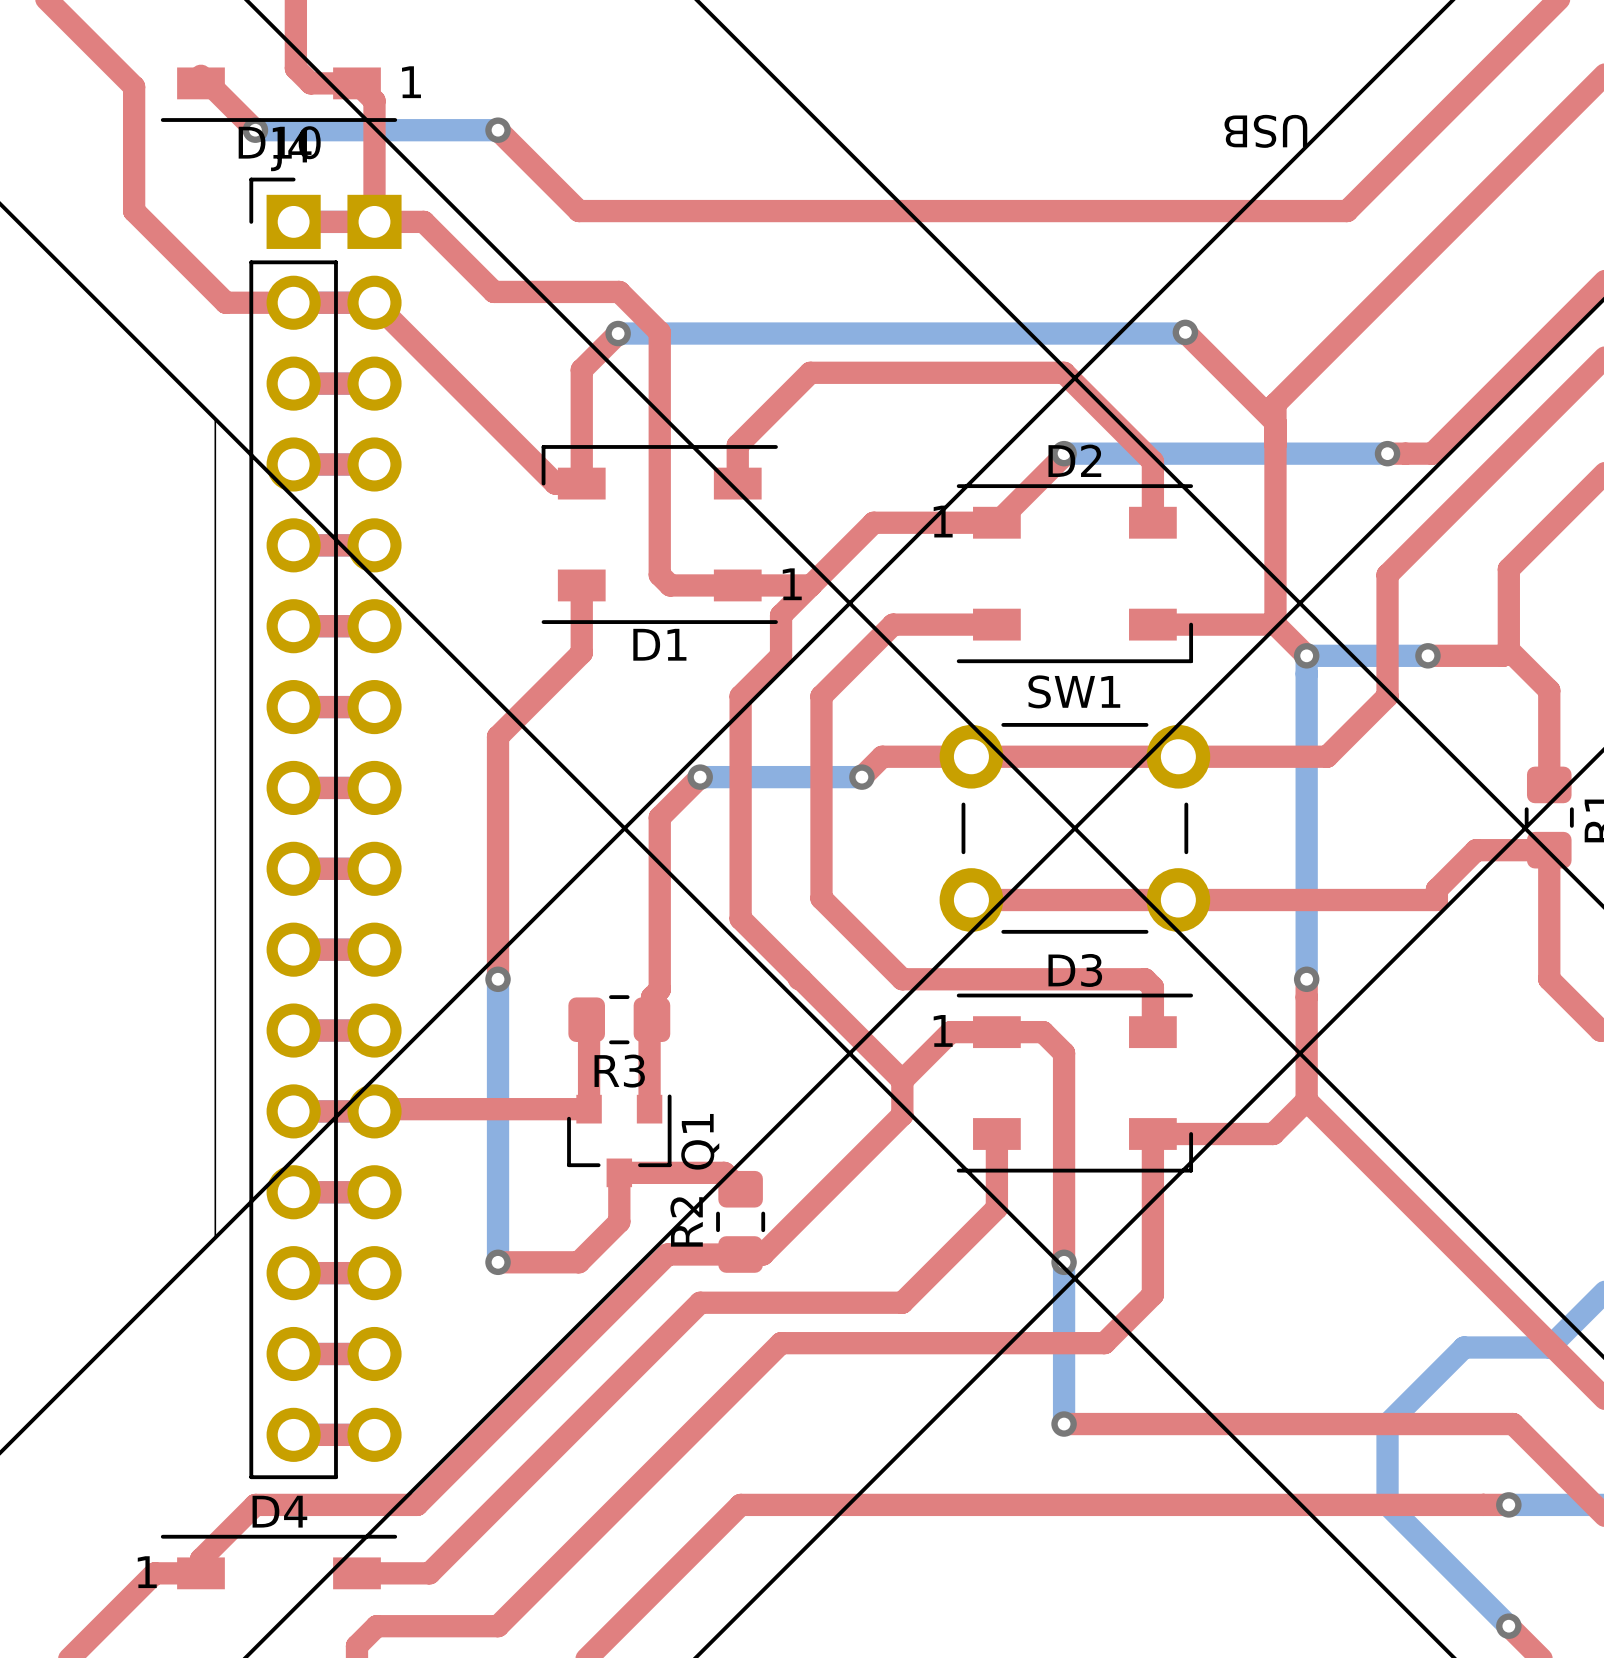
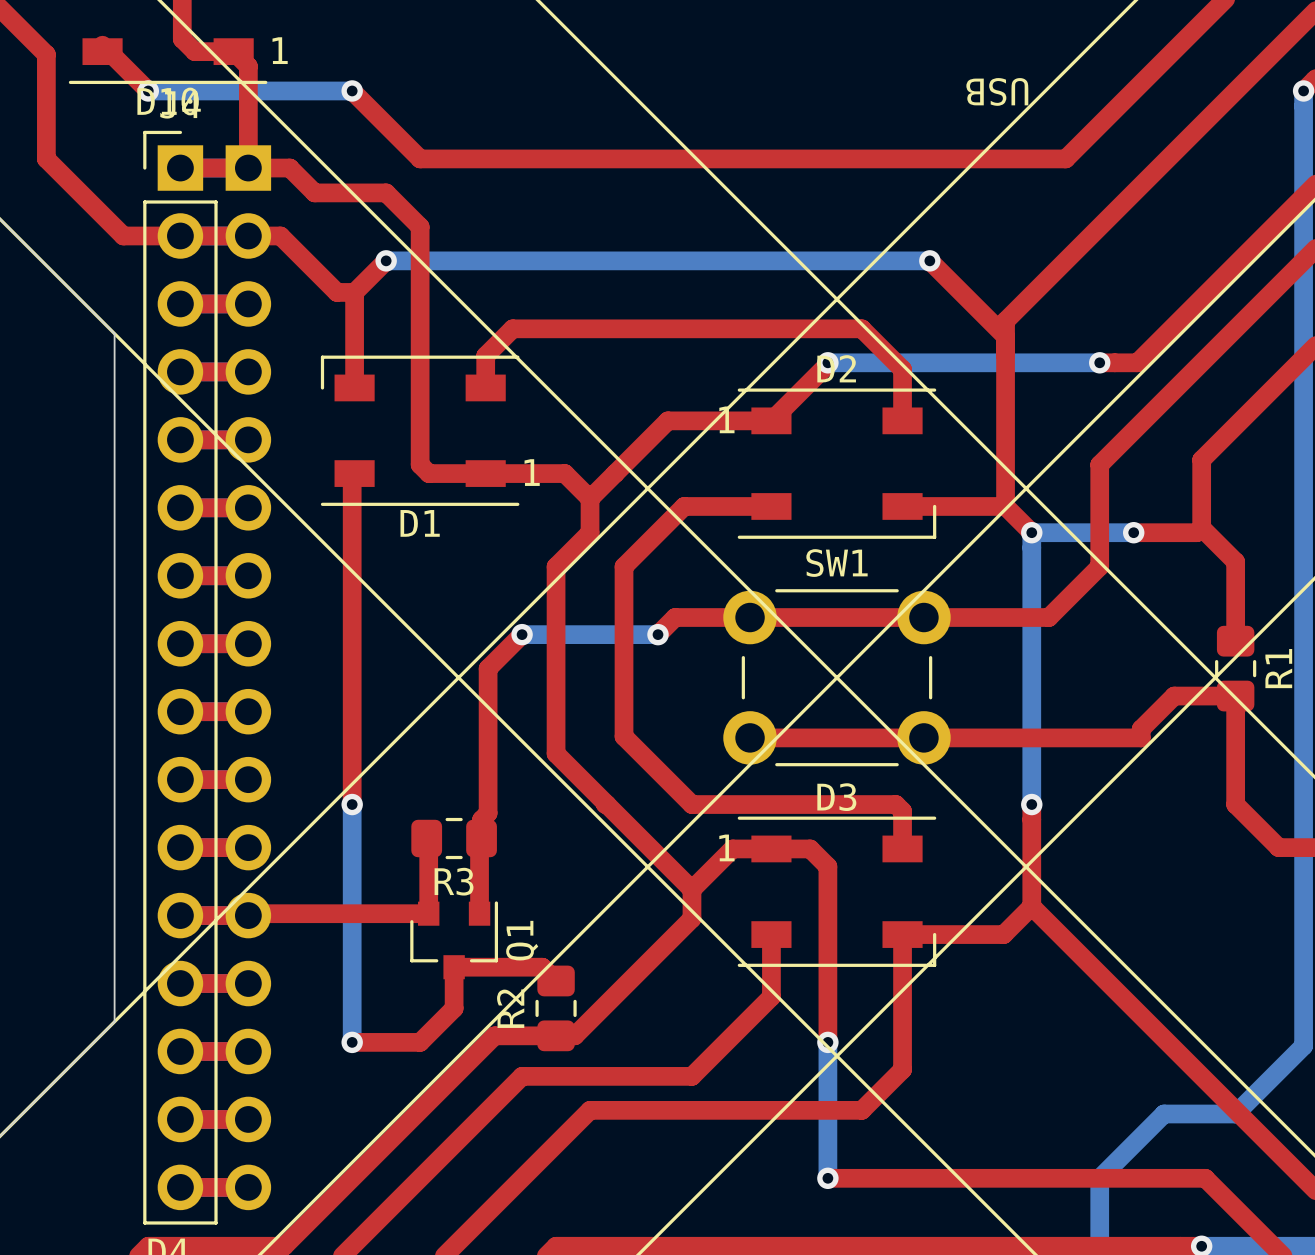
top track: (453, 251) (493, 291) (619, 291) (659, 332) (659, 574) (670, 585) -> (314, 192) (386, 192) (420, 226) (420, 464) (428, 473) (496, 473)
top track: (374, 302) (555, 483) (581, 483) (581, 369) (618, 333) -> (248, 235) (280, 235) (336, 292) (354, 292)
top track: none -> (386, 260) (354, 292)
bottom track: (1185, 332) (618, 333) -> (929, 260) (386, 260)
via position: (618, 333) -> (386, 260)
top track: none -> (354, 292) (354, 387)
top track: (1104, 413) (1064, 372) (810, 372) (737, 445) (737, 483) -> (861, 328) (512, 328) (485, 355) (485, 387)
D1 position: (659, 534) -> (420, 430)
top track: (581, 585) (581, 652) (498, 736) -> (354, 473) (352, 475) (352, 600)
top track: (751, 585) (810, 585) -> (564, 473) (590, 498)

